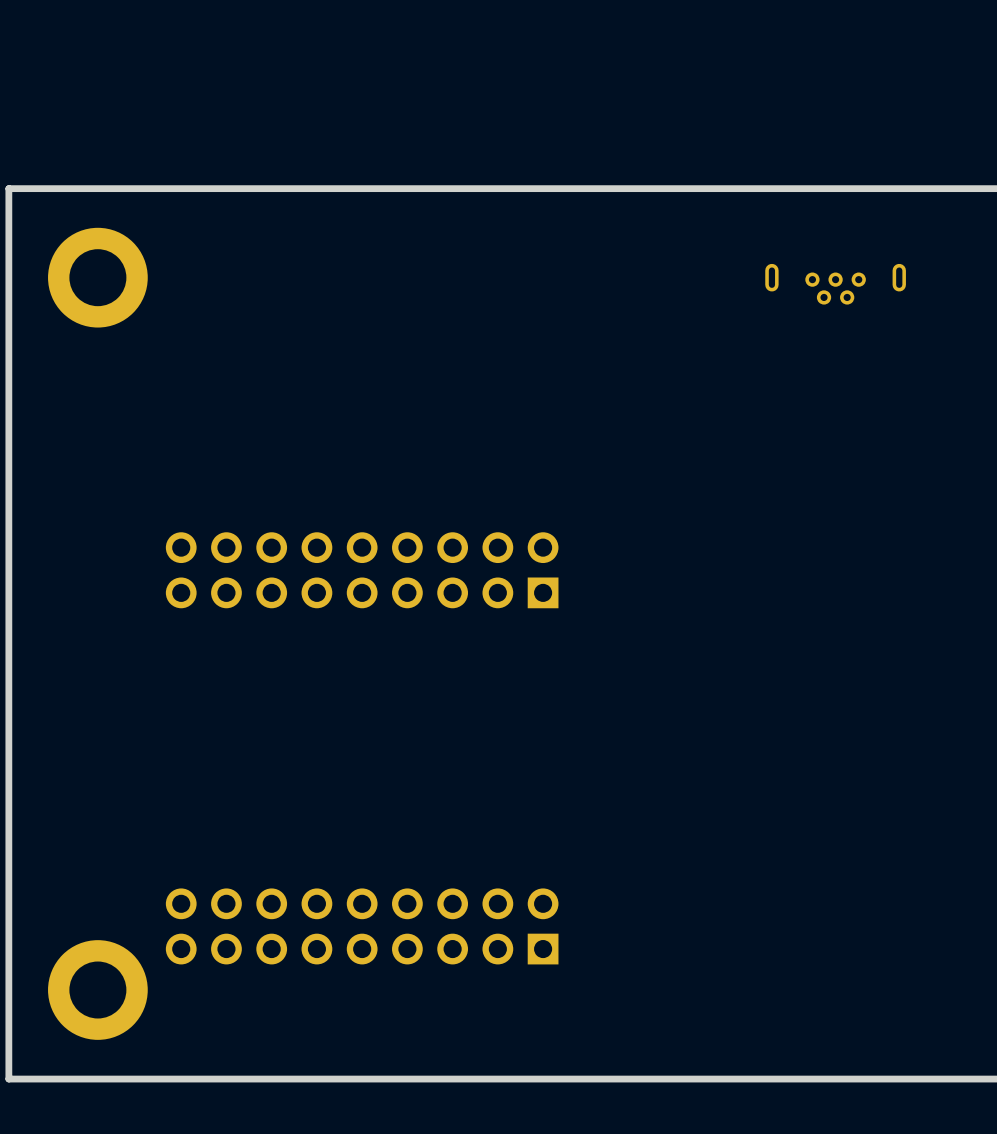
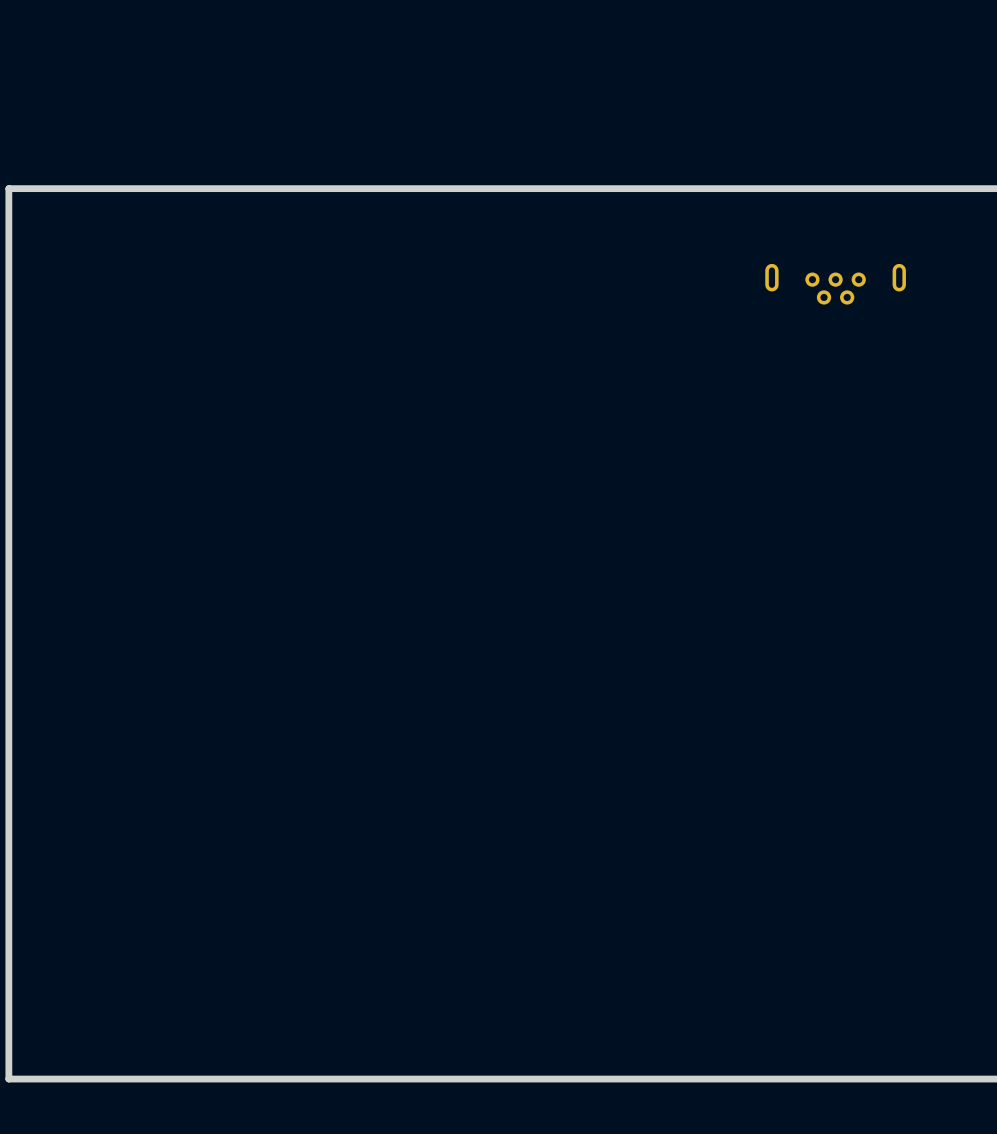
part: (97, 277) -> none
part: (362, 570) -> none
part: (362, 926) -> none
part: (97, 990) -> none

